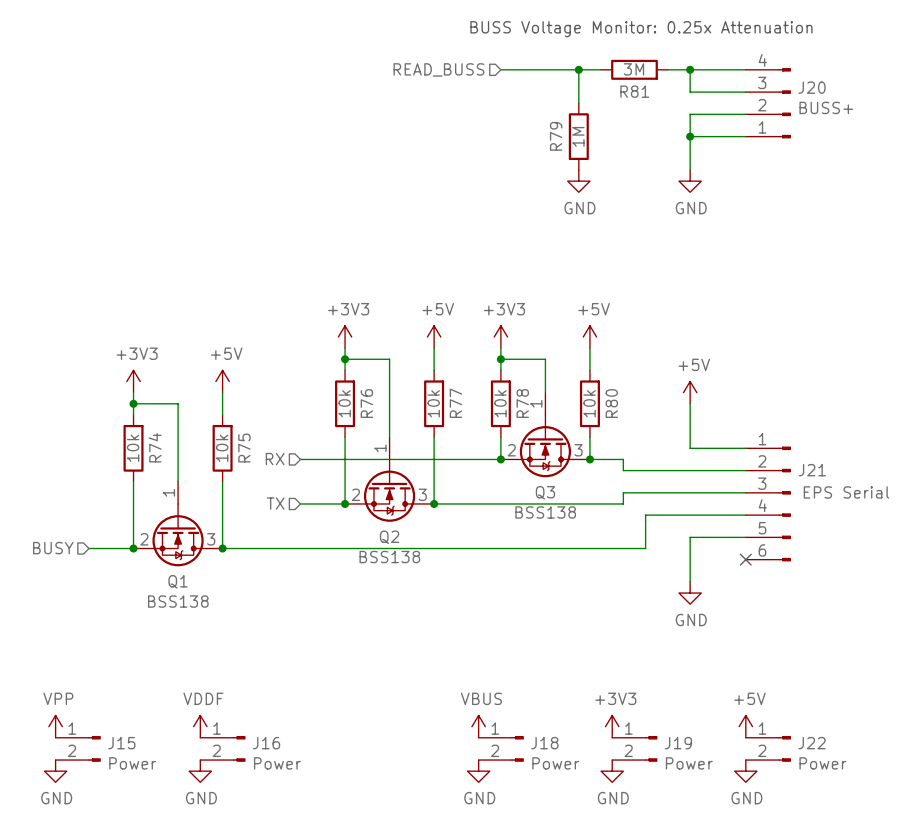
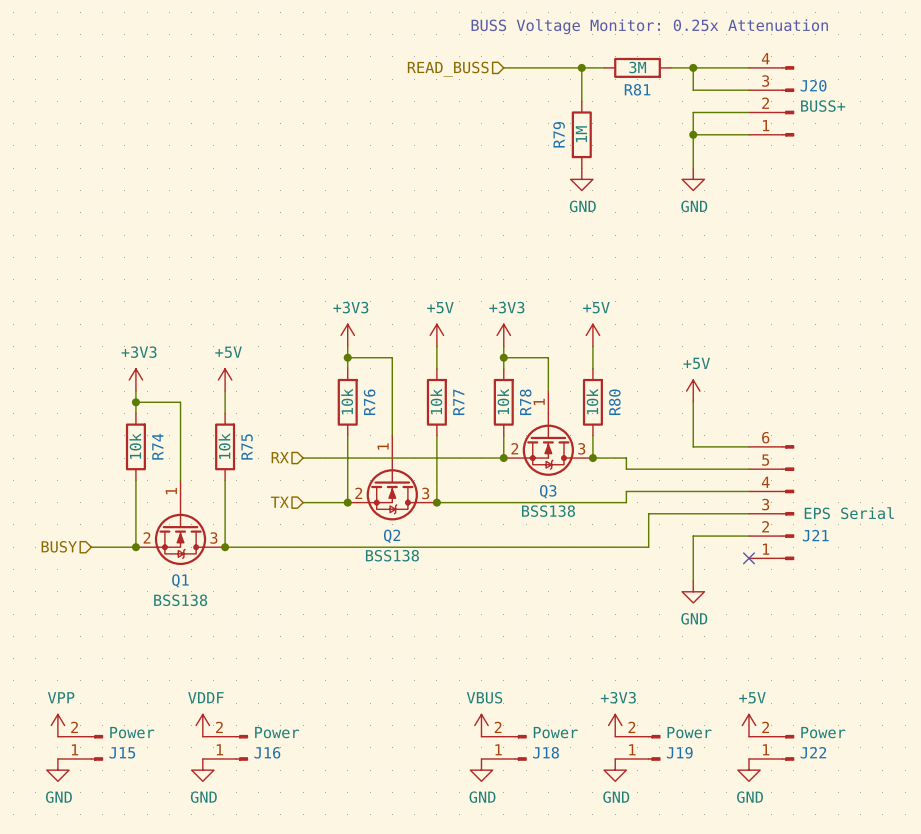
J21 flip: as is (784, 503) -> up-down (788, 502)
J15 flip: as is (94, 748) -> up-down (96, 747)
J16 flip: as is (239, 748) -> up-down (241, 747)
J18 flip: as is (517, 748) -> up-down (520, 747)
J19 flip: as is (651, 748) -> up-down (654, 747)
J22 flip: as is (784, 748) -> up-down (788, 747)

